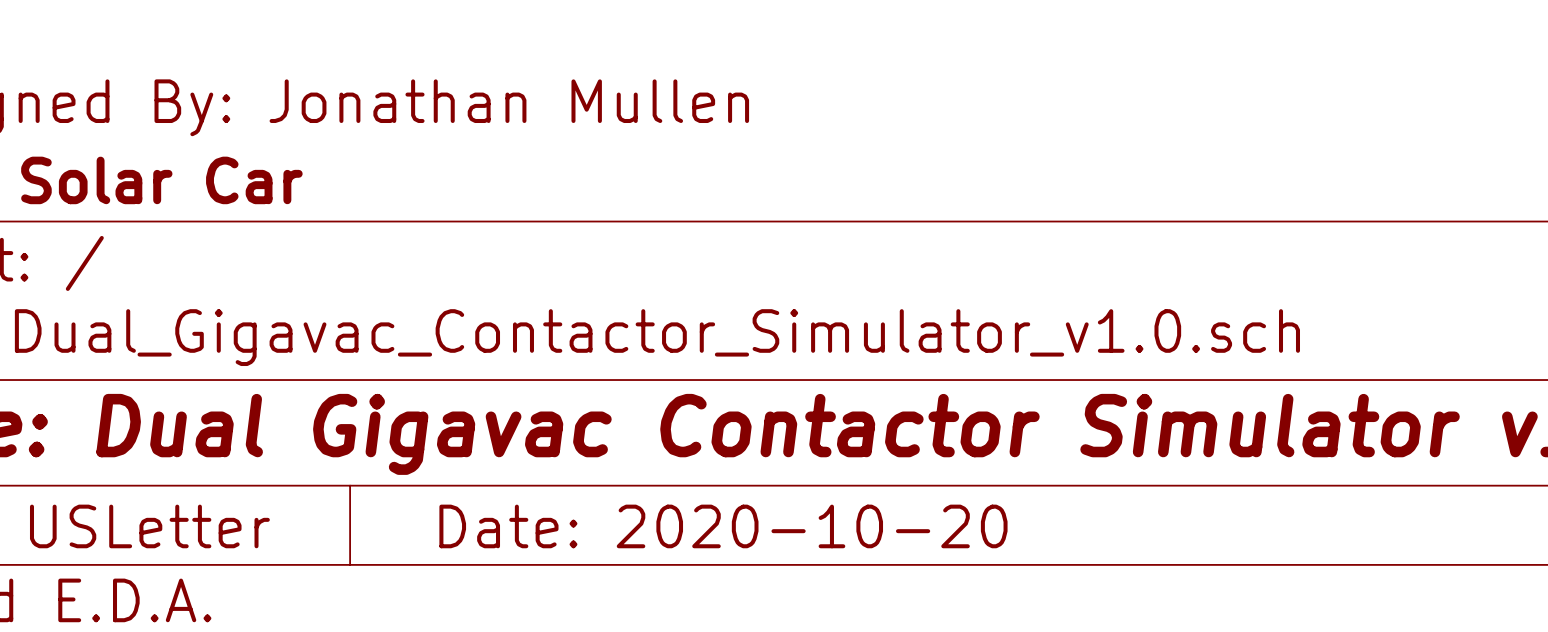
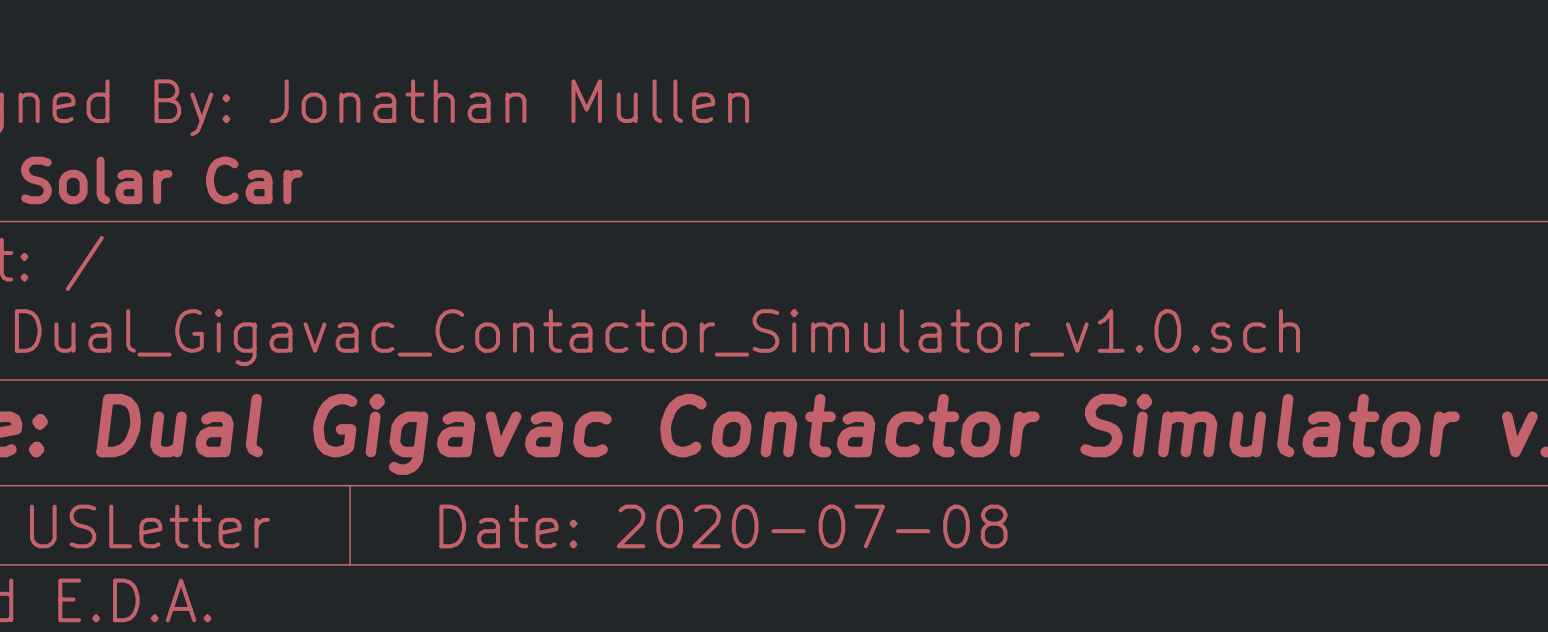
title block: Date: 2020-10-20 (723, 526) -> Date: 2020-07-08 (723, 526)

